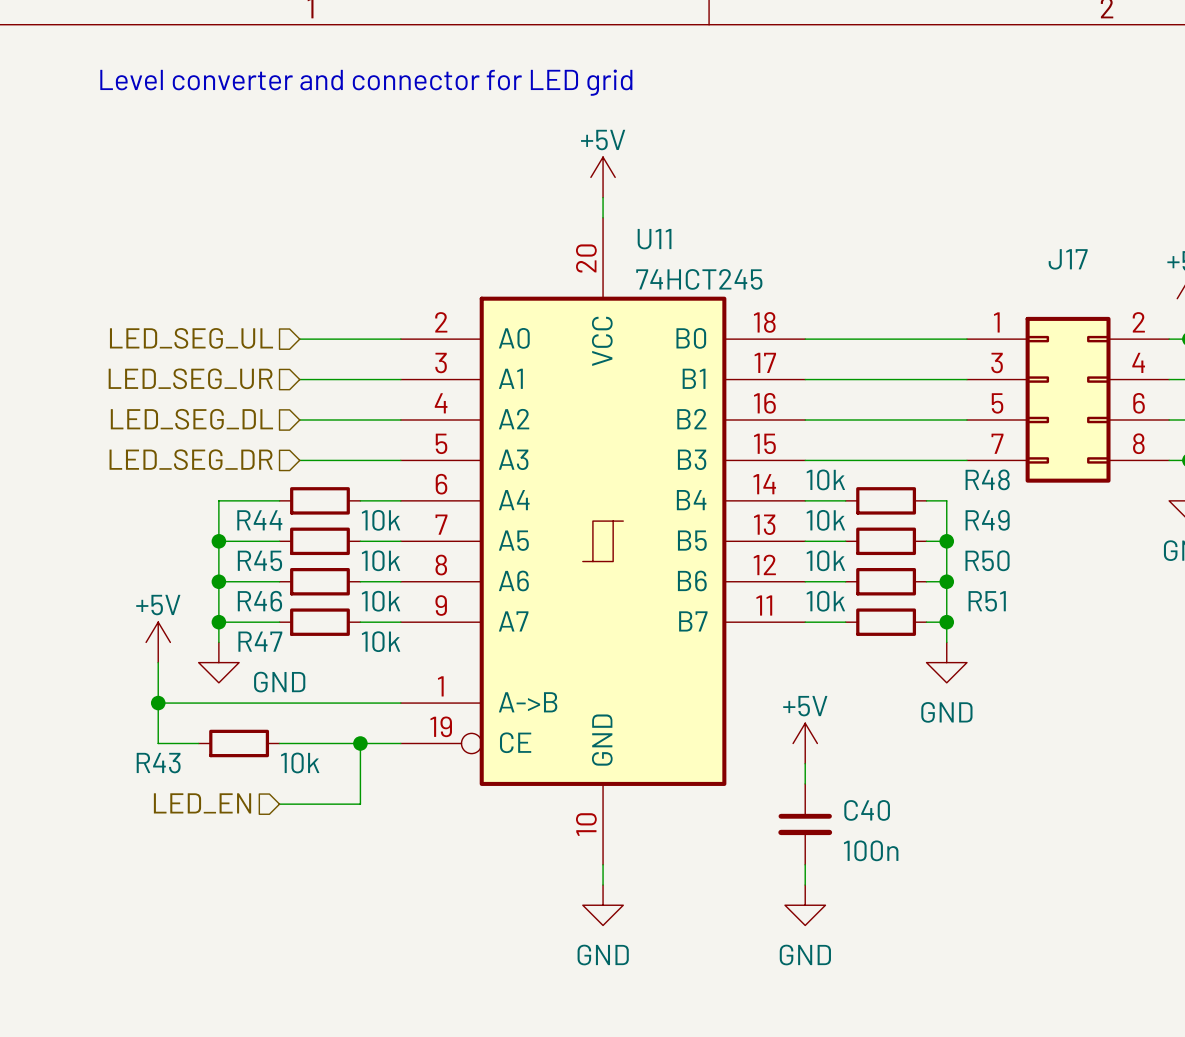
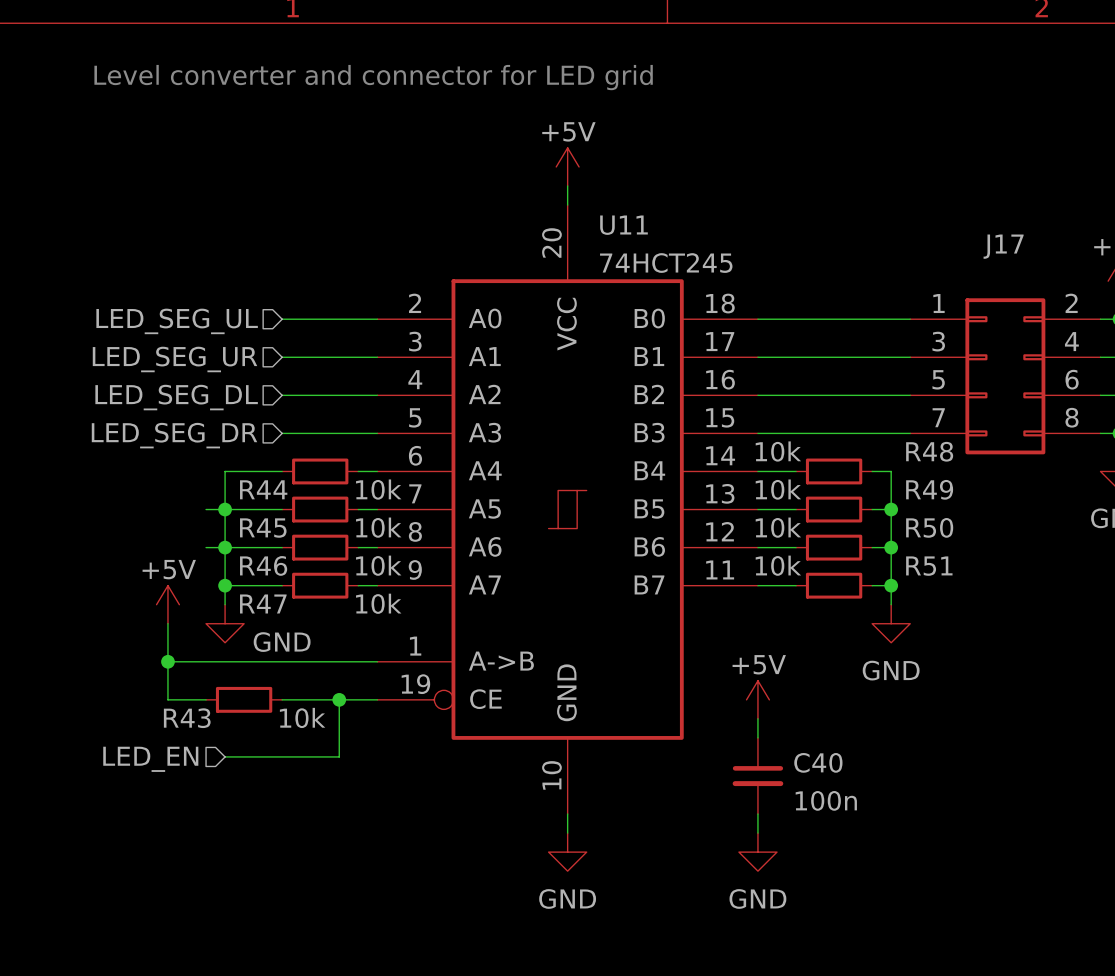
wire: (239, 500) (218, 500) (218, 642) -> (225, 471) (225, 604)
R44 position: (319, 500) -> (320, 471)
junction position: (218, 541) -> (225, 509)
R45 position: (319, 541) -> (320, 509)
junction position: (218, 581) -> (225, 547)
R46 position: (319, 581) -> (320, 547)
wire: (218, 622) (239, 622) -> none
junction position: (218, 622) -> (225, 585)
R47 position: (319, 622) -> (320, 585)
power symbol position: +5V (158, 642) -> +5V (167, 604)
wire: (158, 662) (158, 743) (178, 743) -> (167, 623) (167, 699)
power symbol position: GND (218, 662) -> GND (225, 623)
wire: (158, 703) (178, 703) -> none
junction position: (158, 703) -> (167, 661)
R43 position: (239, 743) -> (244, 699)
R43 name position: R43 (158, 763) -> R43 (187, 718)
hierarchical label position: LED_EN (202, 803) -> LED_EN (150, 759)
wire: none -> (225, 756) (263, 756)

